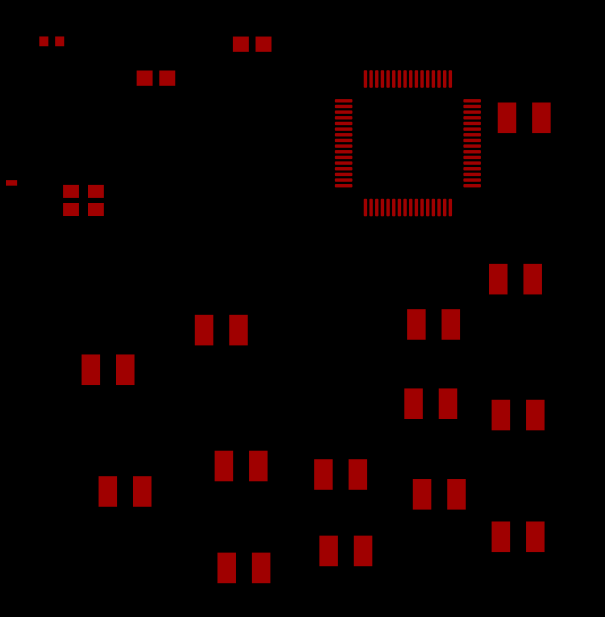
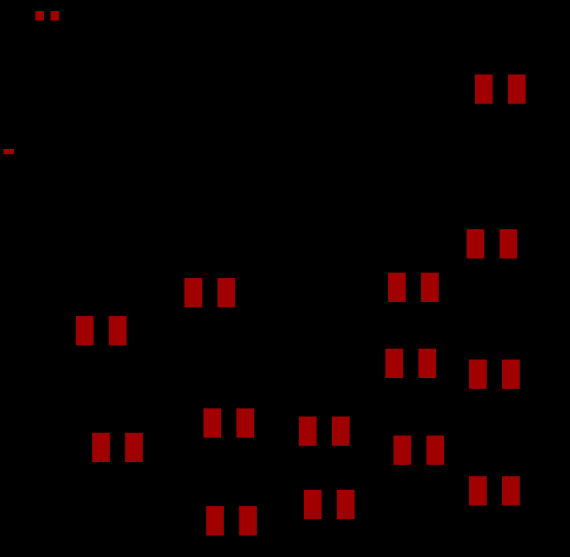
part: (252, 44) -> none
part: (155, 78) -> none
part: (407, 143) -> none
part: (83, 200) -> none

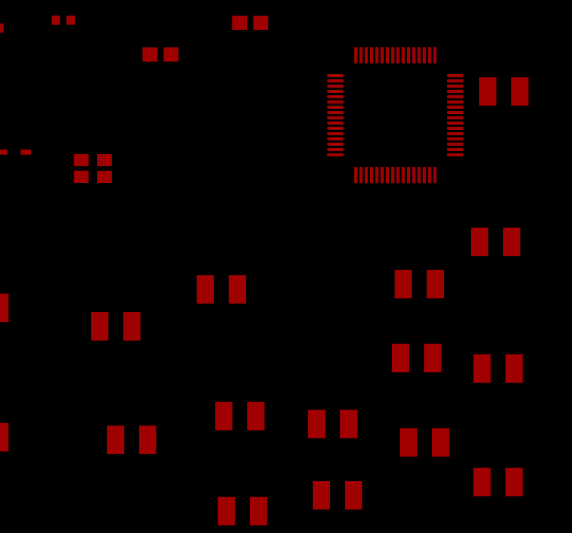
part: none -> (250, 22)
part: none -> (160, 54)
part: none -> (395, 115)
part: none -> (92, 168)

